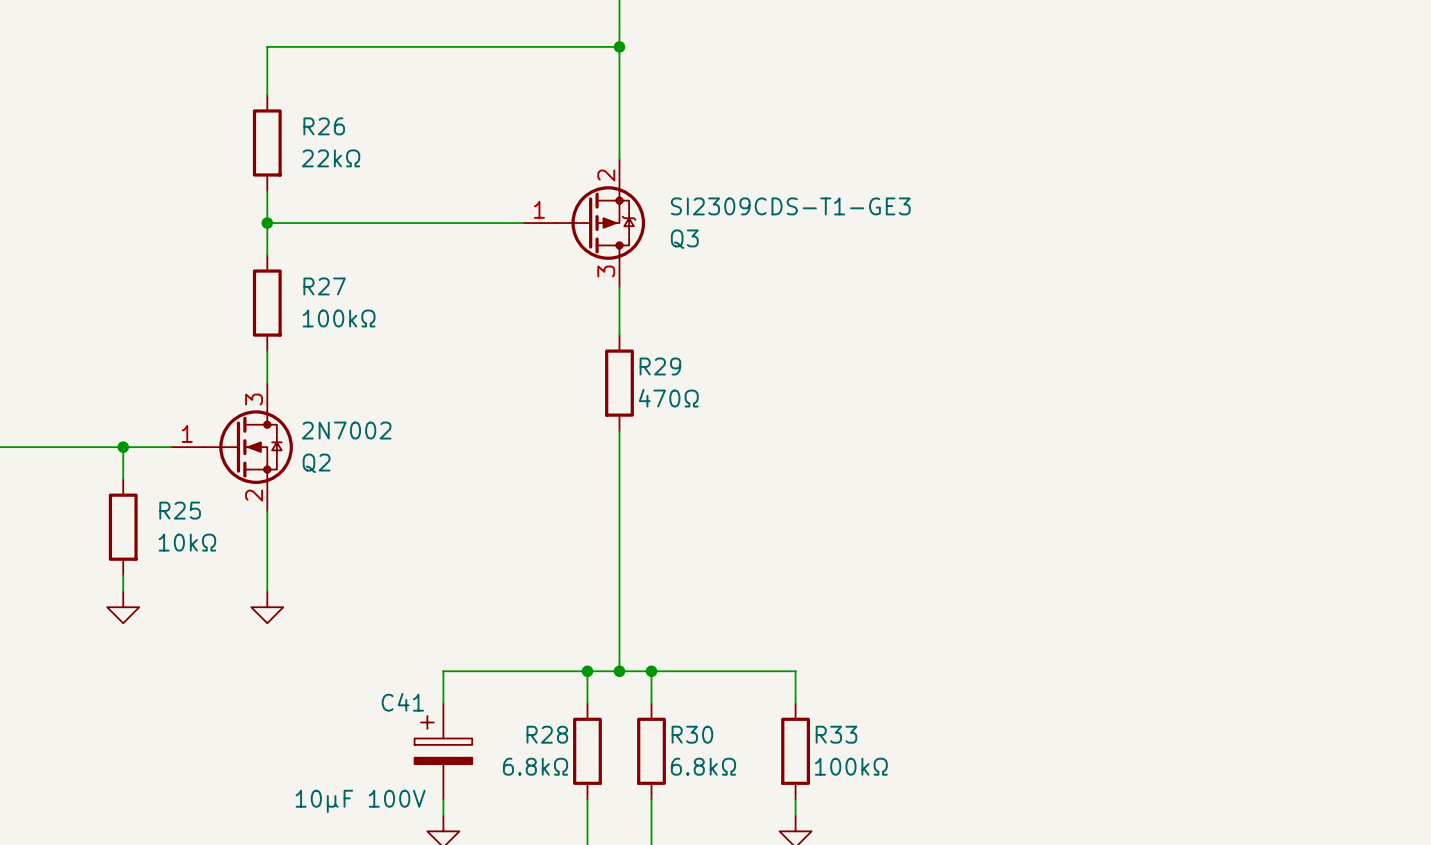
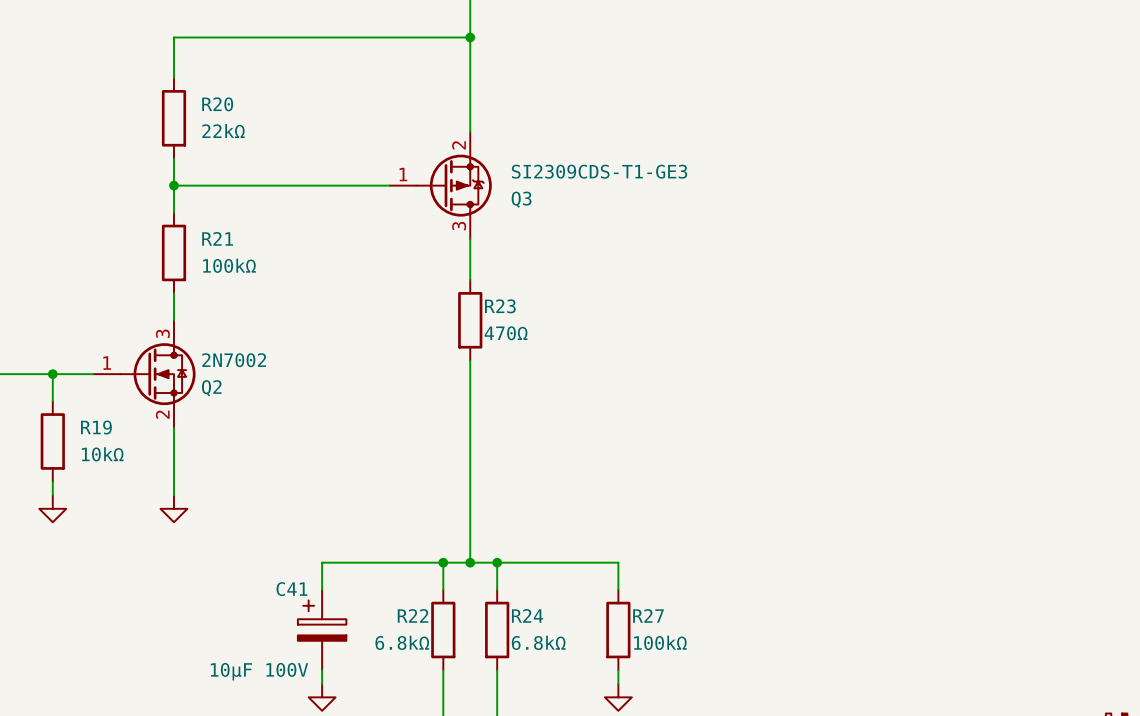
R26 name: R26 (324, 126) -> R20 (217, 104)
R27 name: R27 (324, 286) -> R21 (217, 238)
R29 name: R29 (660, 366) -> R23 (500, 306)
R25 name: R25 (180, 510) -> R19 (96, 427)
R28 name: R28 (547, 734) -> R22 (413, 615)
R30 name: R30 (692, 734) -> R24 (527, 615)
R33 name: R33 (836, 734) -> R27 (648, 615)

